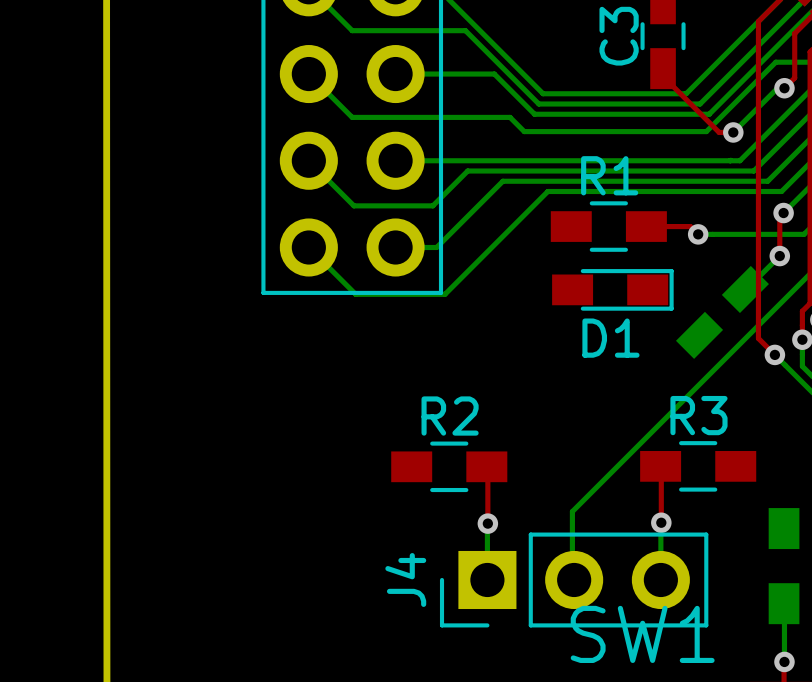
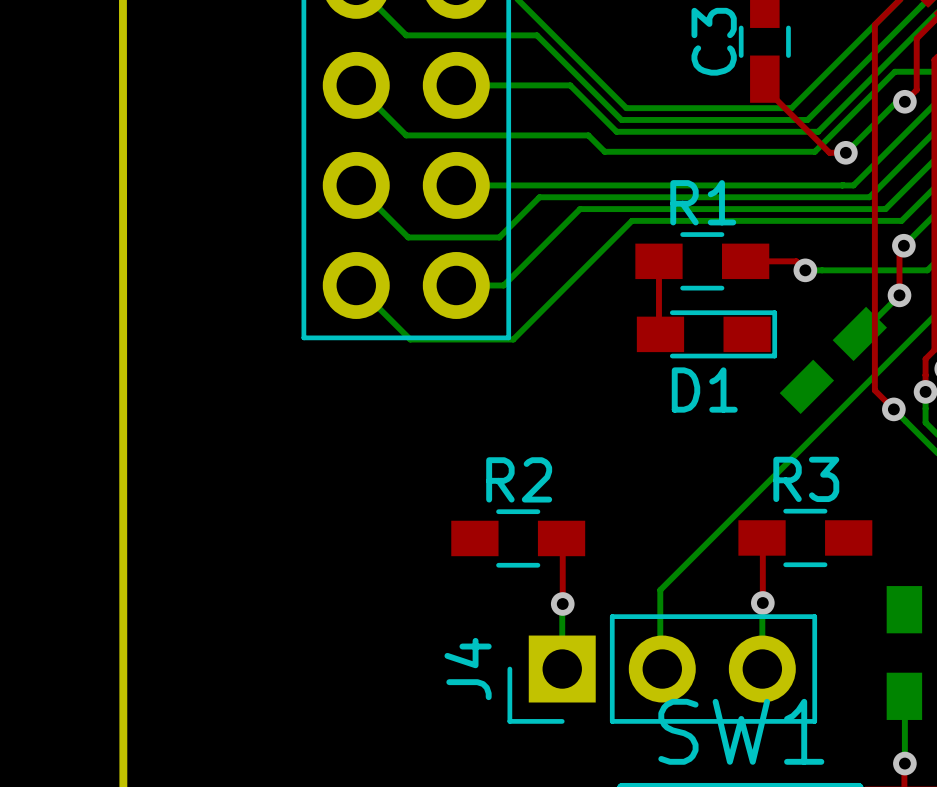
top track: none -> (658, 261) (660, 334)

